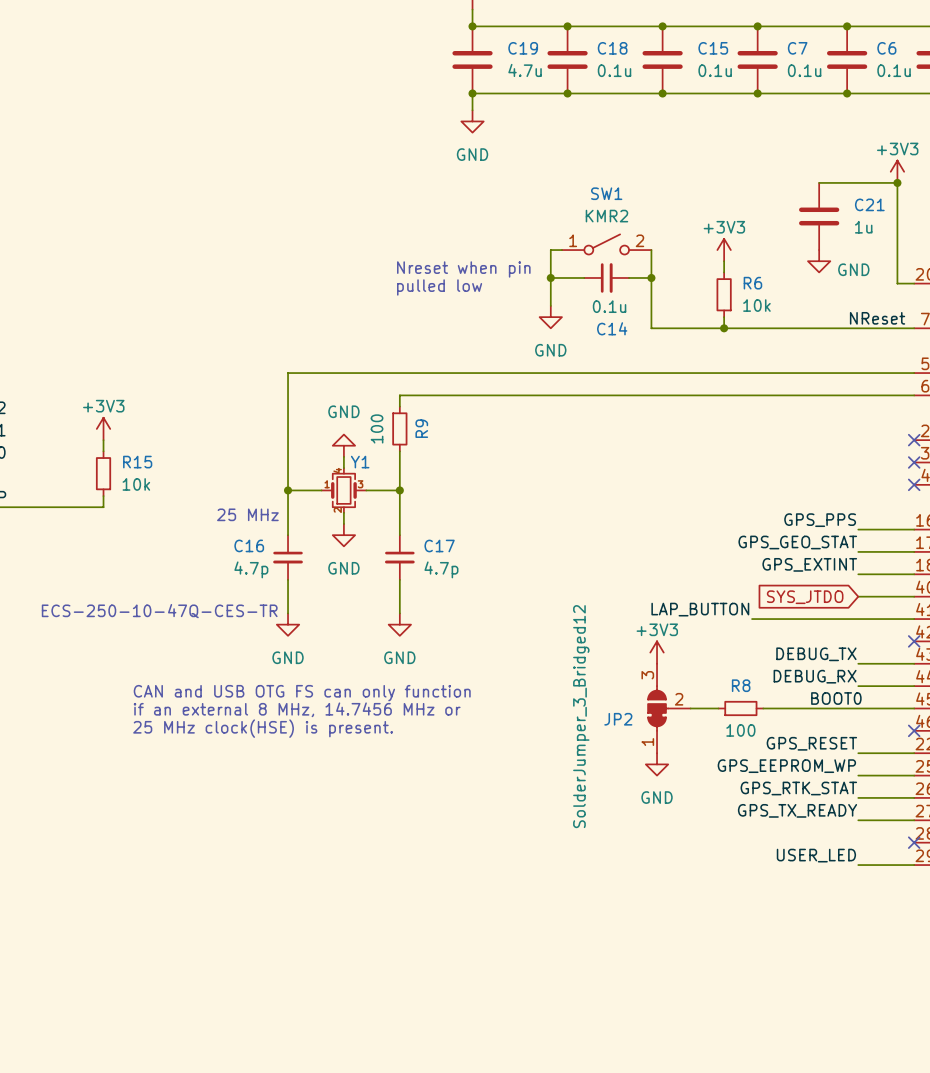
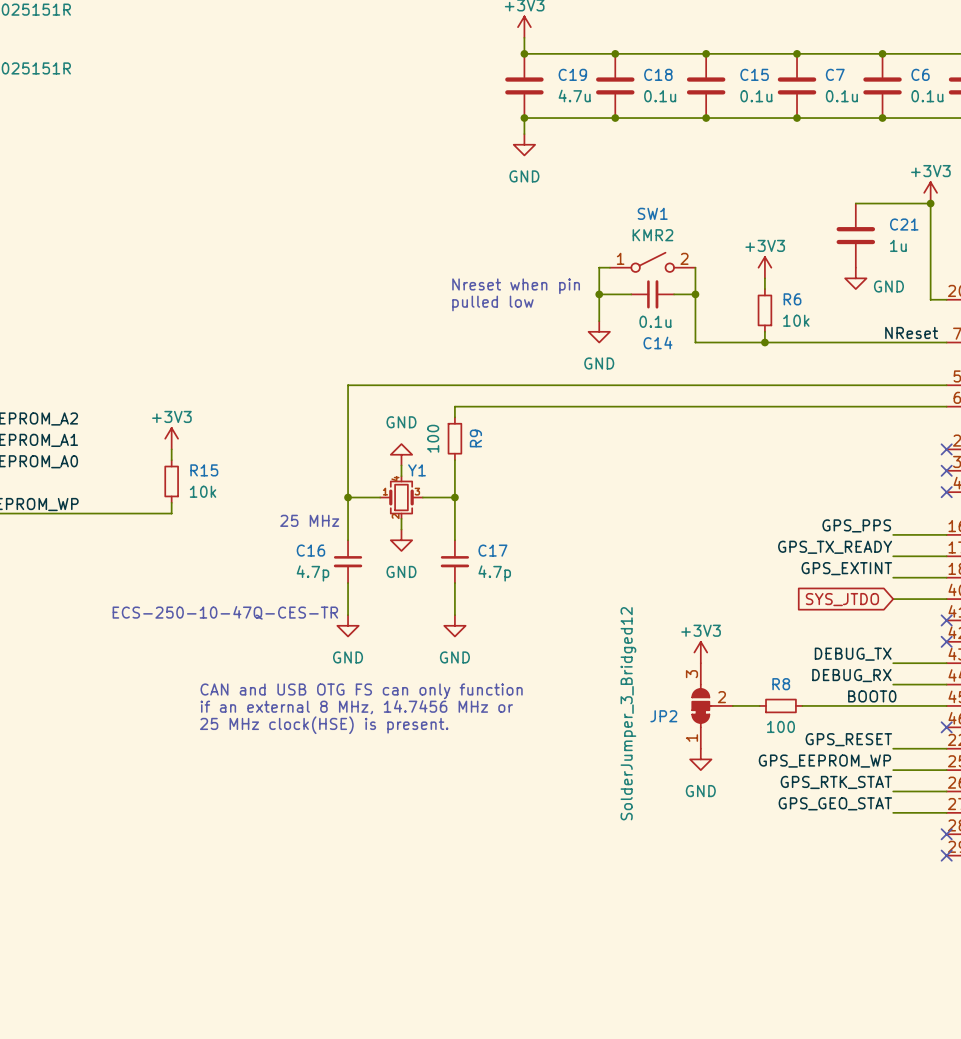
label: GPS_GEO_STAT (797, 542) -> GPS_TX_READY (835, 547)
label: LAP_BUTTON (700, 609) -> none
wire: (752, 619) (914, 619) -> none
no-connect mark: none -> (946, 620)
label: GPS_TX_READY (797, 810) -> GPS_GEO_STAT (835, 803)
label: USER_LED (816, 855) -> none
wire: (858, 865) (914, 865) -> none
no-connect mark: none -> (946, 855)

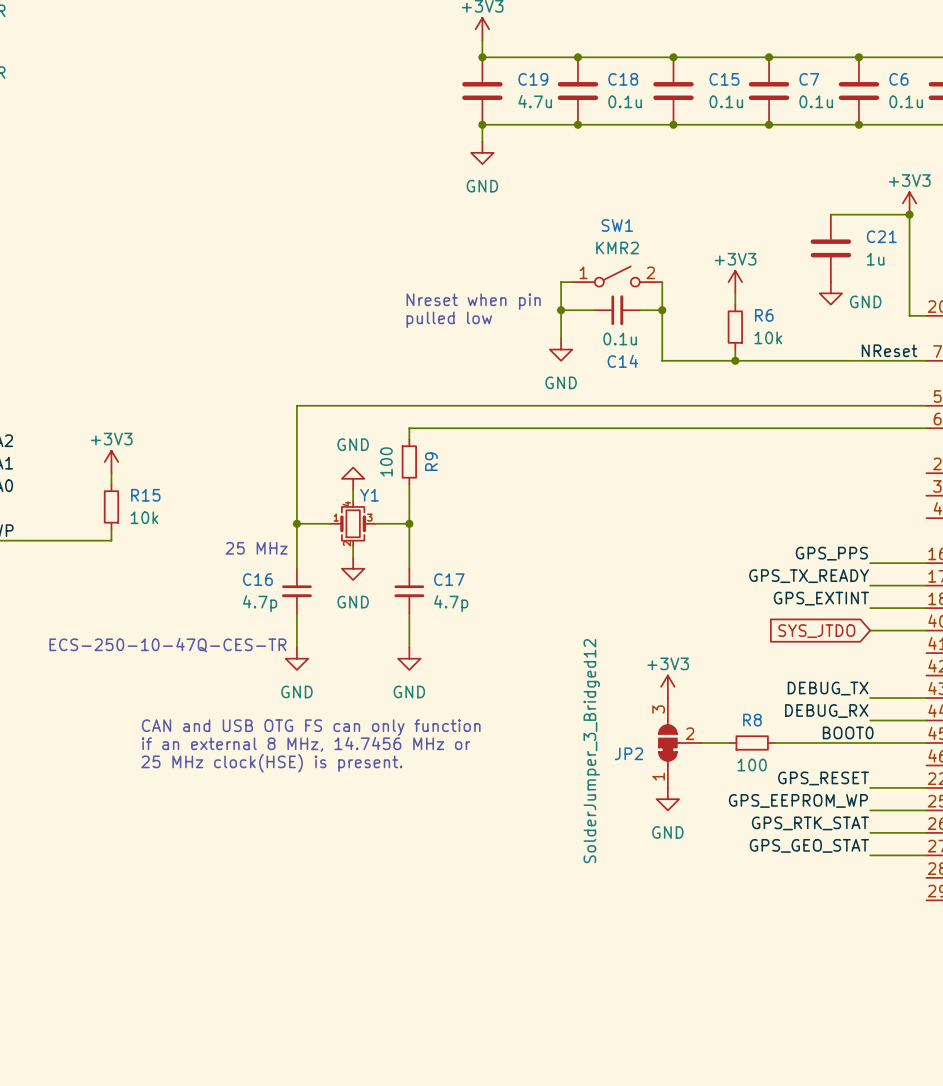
no-connect mark: (946, 449) -> none
no-connect mark: (946, 470) -> none
no-connect mark: (946, 492) -> none
no-connect mark: (946, 620) -> none
no-connect mark: (946, 641) -> none
no-connect mark: (946, 727) -> none
no-connect mark: (946, 834) -> none
no-connect mark: (946, 855) -> none

